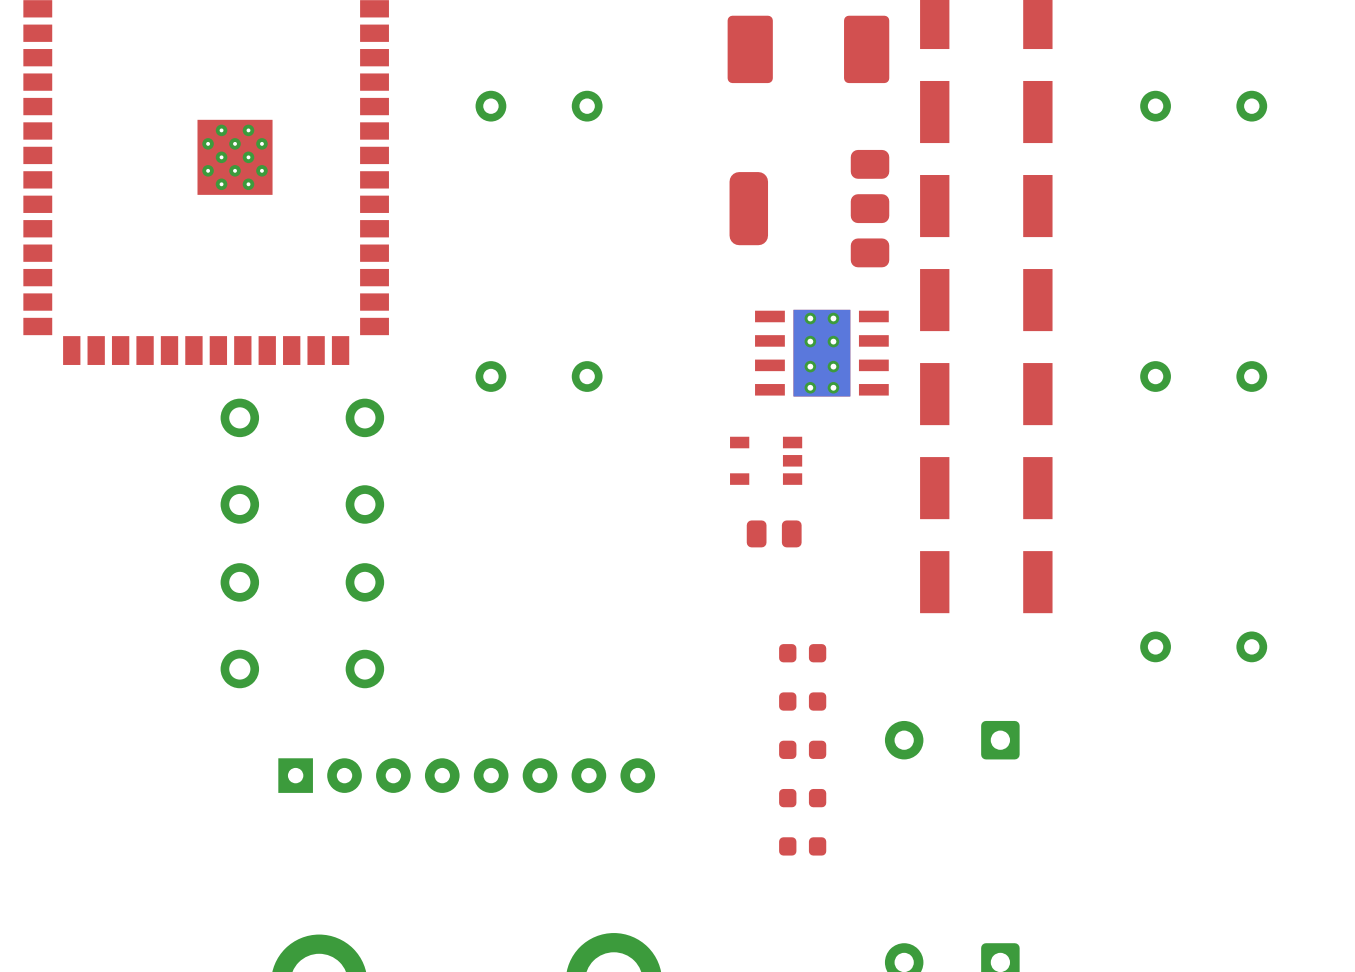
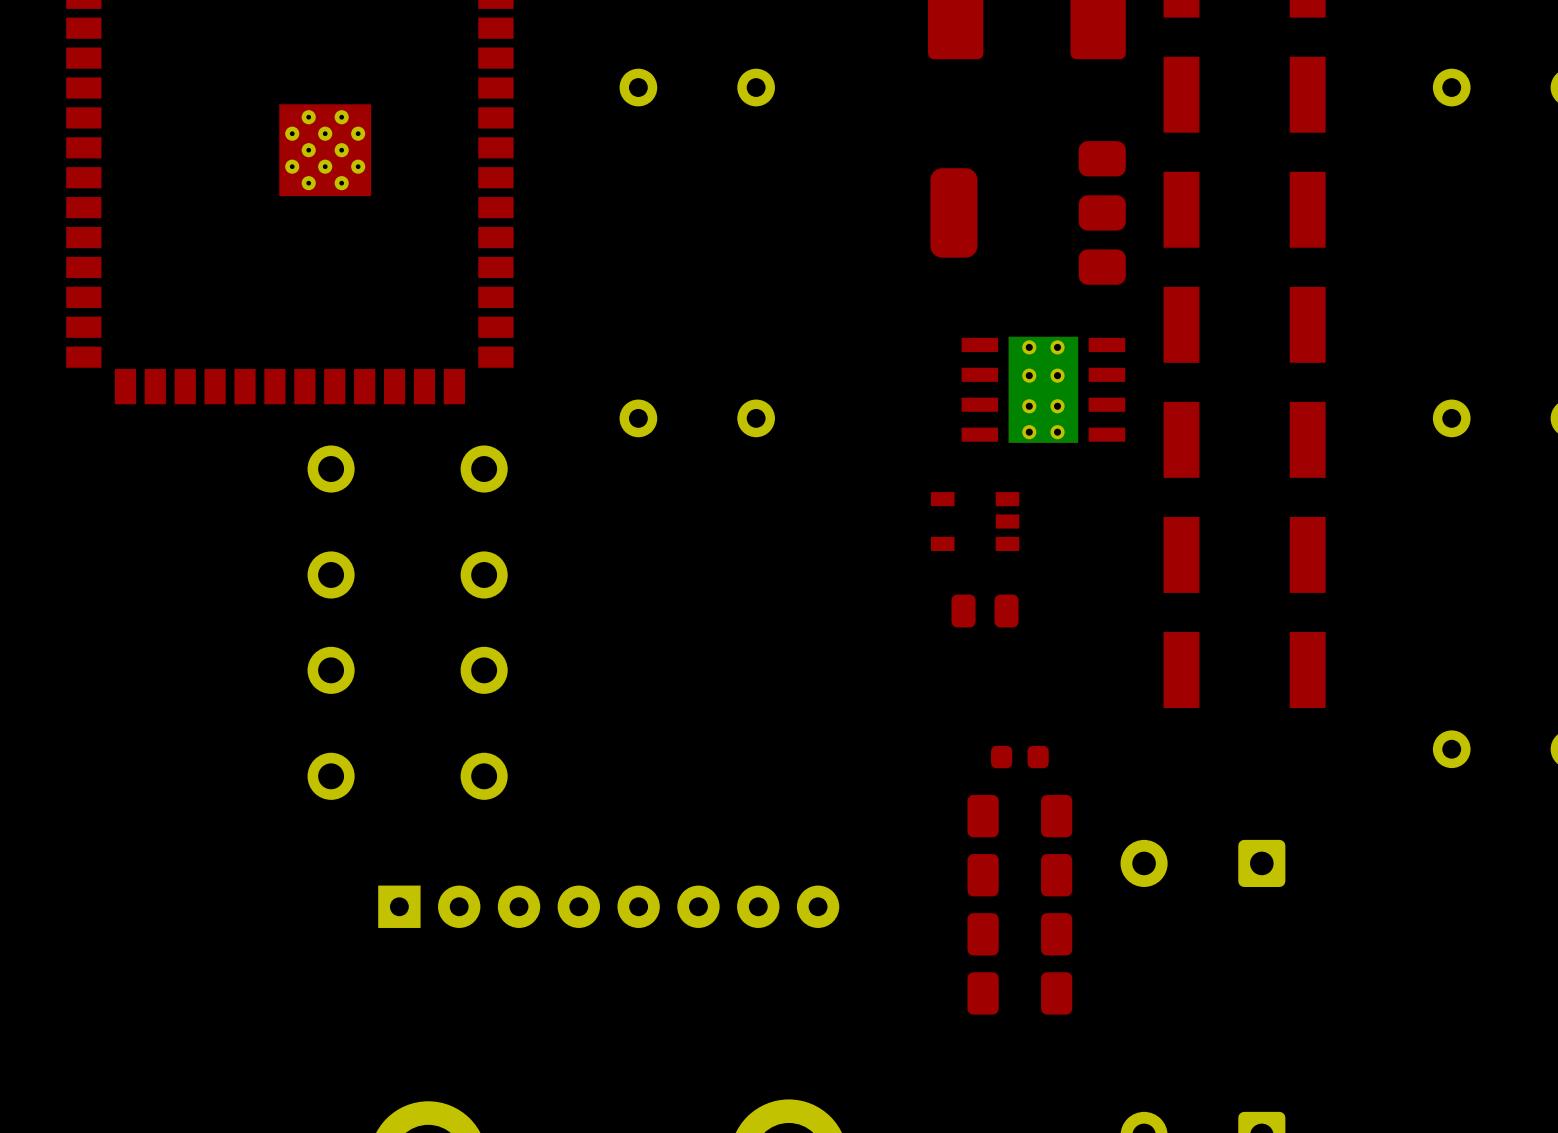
part footprint: [779, 692, 827, 711] -> [967, 794, 1073, 838]
part footprint: [779, 740, 827, 759] -> [967, 854, 1073, 897]
part footprint: [779, 788, 827, 808] -> [967, 913, 1073, 956]
part footprint: [779, 837, 827, 856] -> [967, 972, 1073, 1015]

